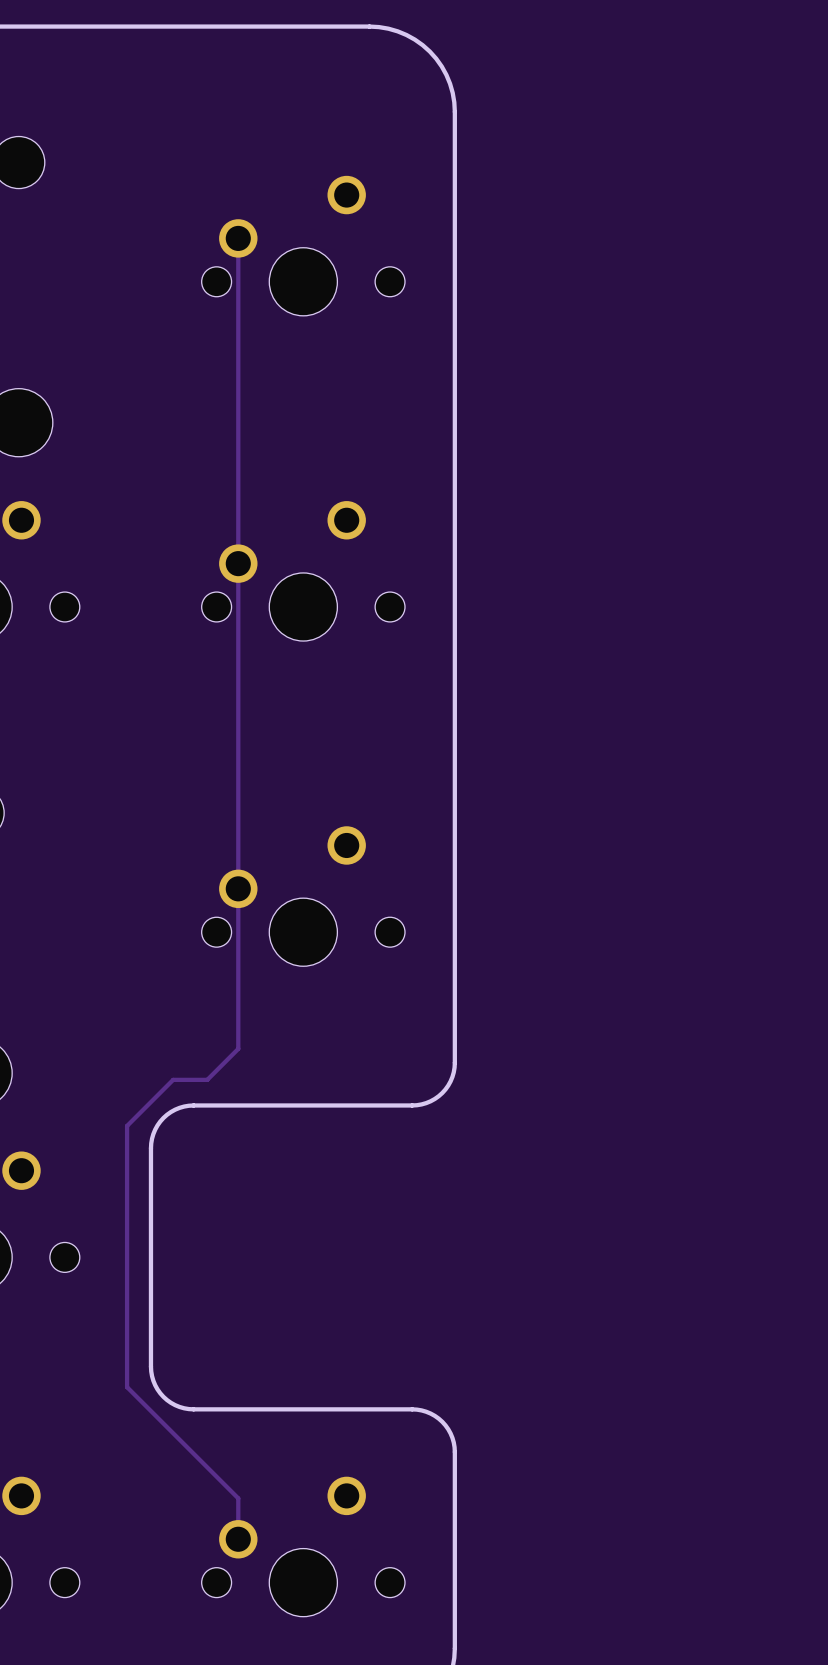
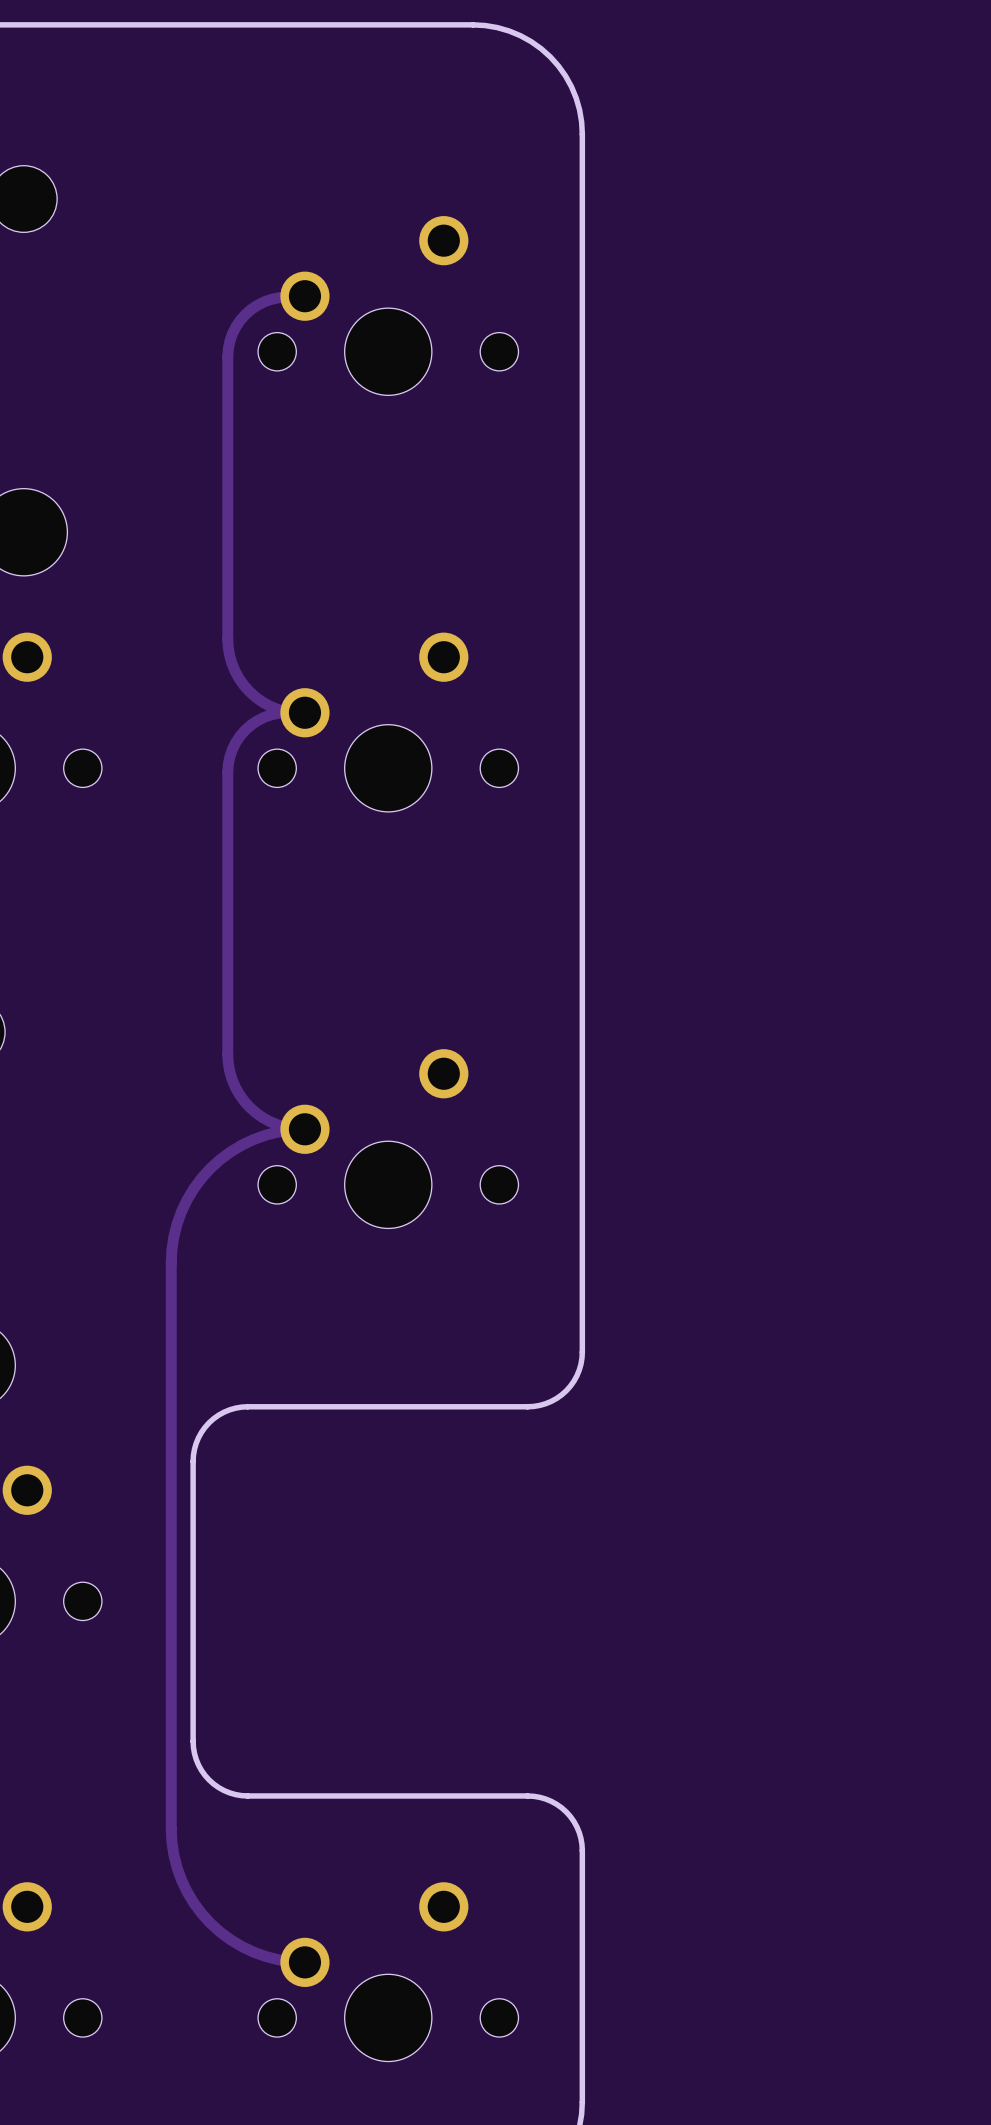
track: (238, 238) (238, 1048) (207, 1079) (173, 1079) (127, 1125) (127, 1387) (238, 1498) (238, 1539) -> (307, 1131) (304, 1129) (291, 1129) (253, 1139) (230, 1151) (210, 1168) (193, 1188) (181, 1211) (173, 1236) (171, 1263) (171, 1828) (173, 1854) (181, 1879) (193, 1902) (220, 1932) (253, 1952) (278, 1959) (304, 1962)
track: none -> (302, 297) (272, 299) (251, 309) (240, 320) (232, 334) (227, 357) (227, 638) (229, 655) (239, 678) (255, 697) (277, 709) (302, 713)
track: none -> (302, 712) (272, 714) (251, 724) (240, 735) (232, 749) (227, 772) (227, 1054) (229, 1071) (239, 1094) (255, 1112) (277, 1124) (302, 1129)

